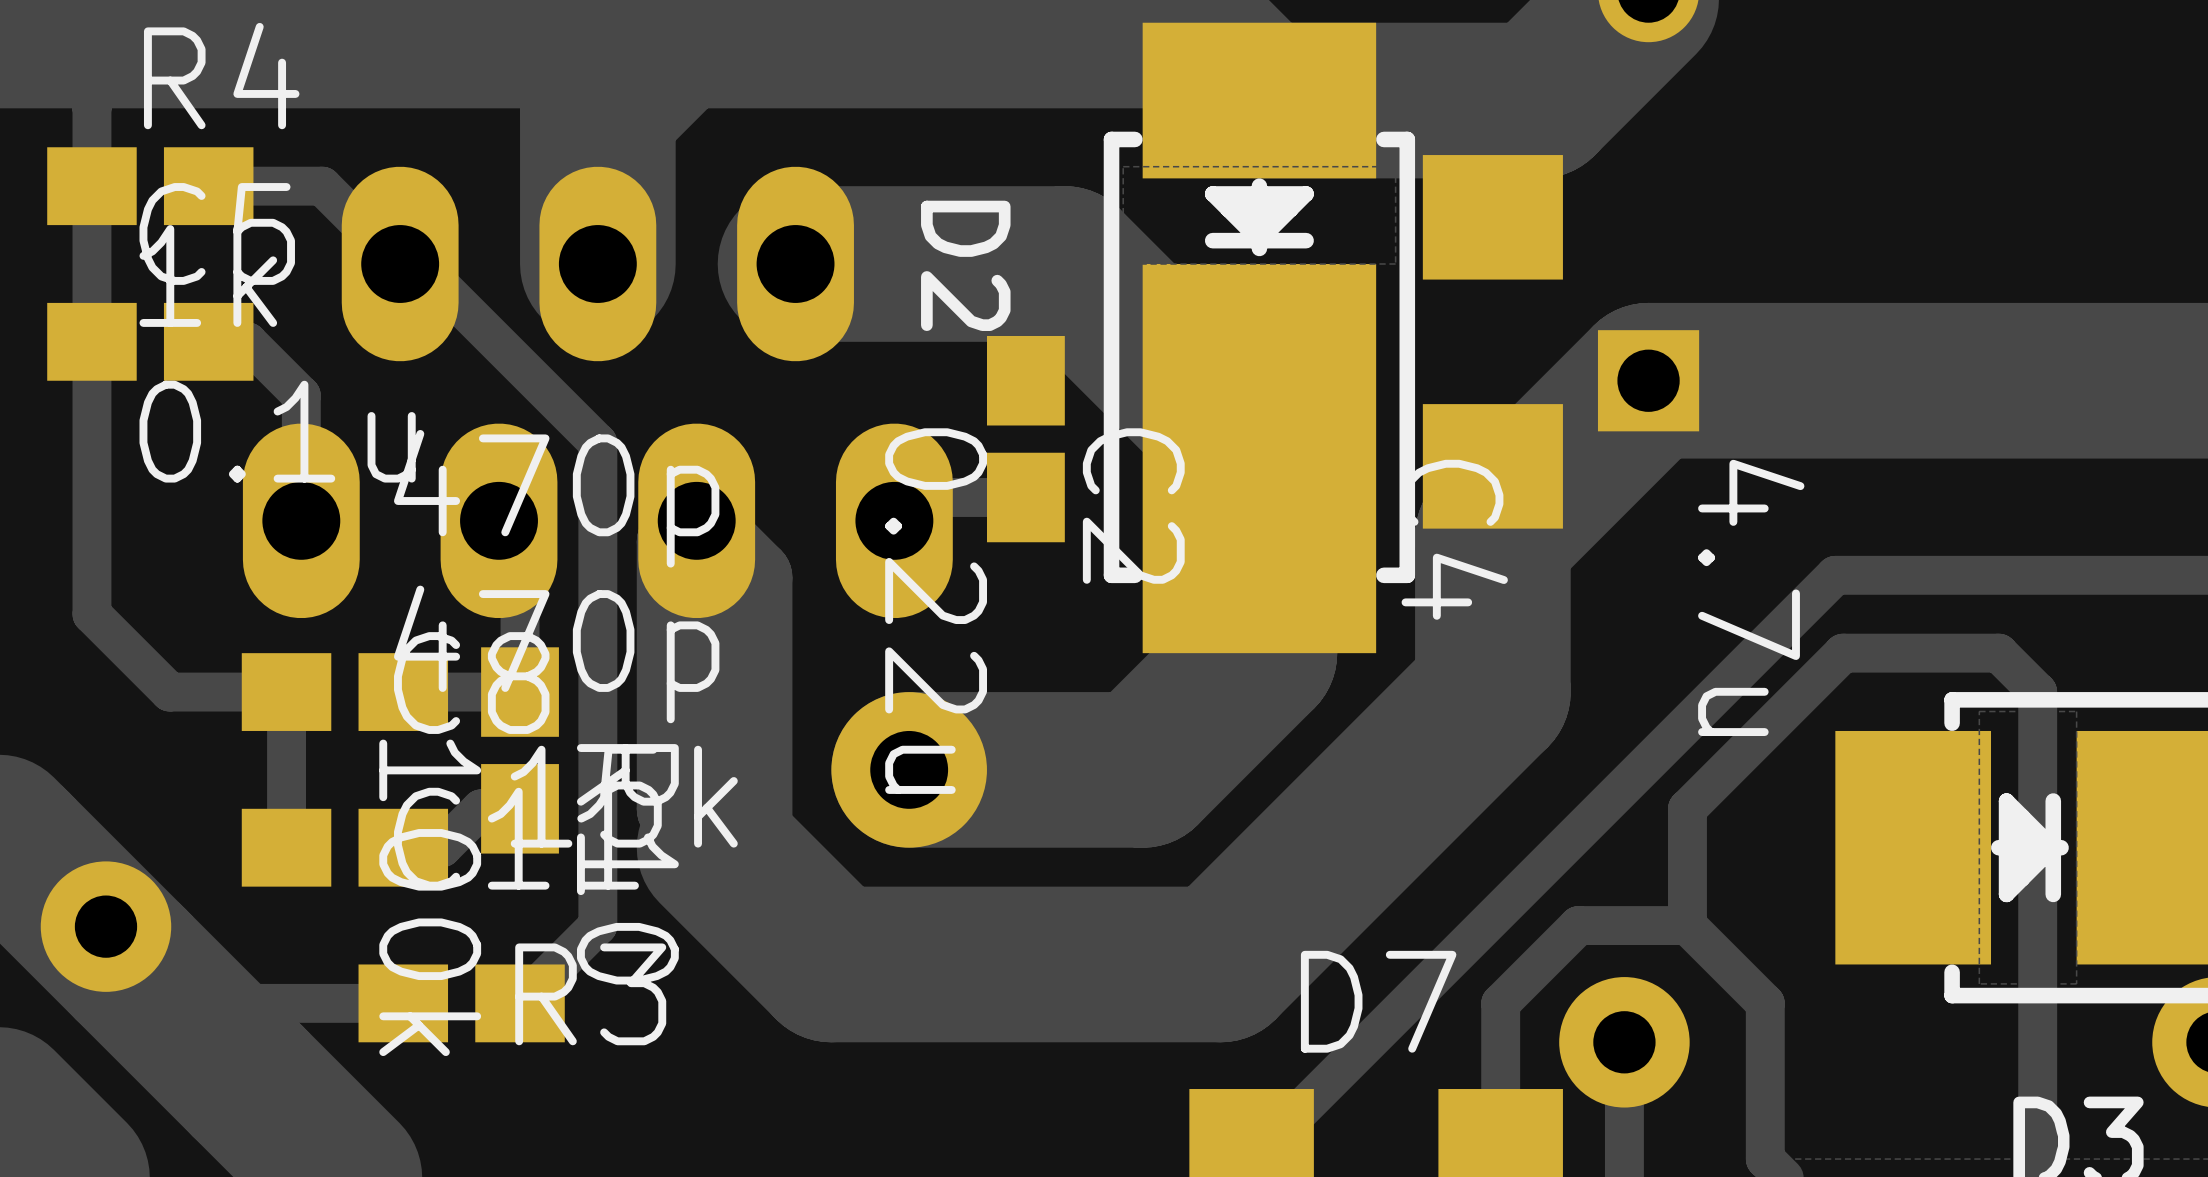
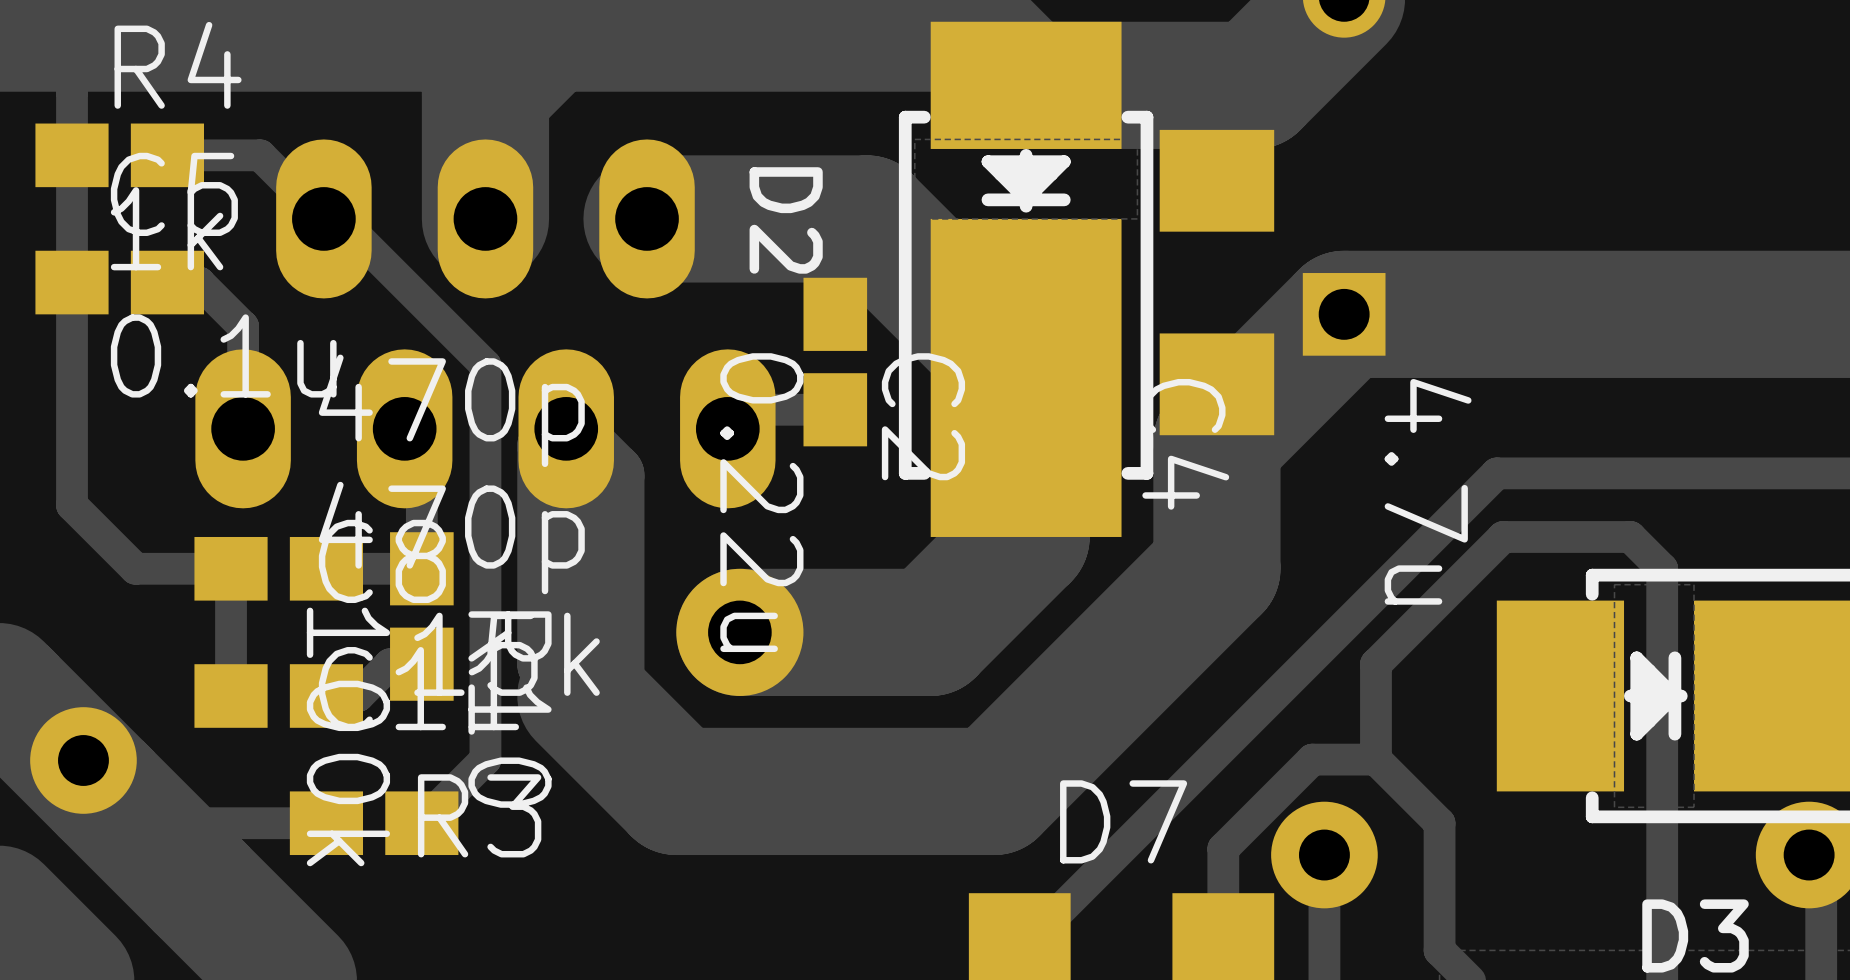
track: (1609, 925) (1578, 925) (1500, 1003) (1500, 1034) -> (1312, 759) (1223, 848)

